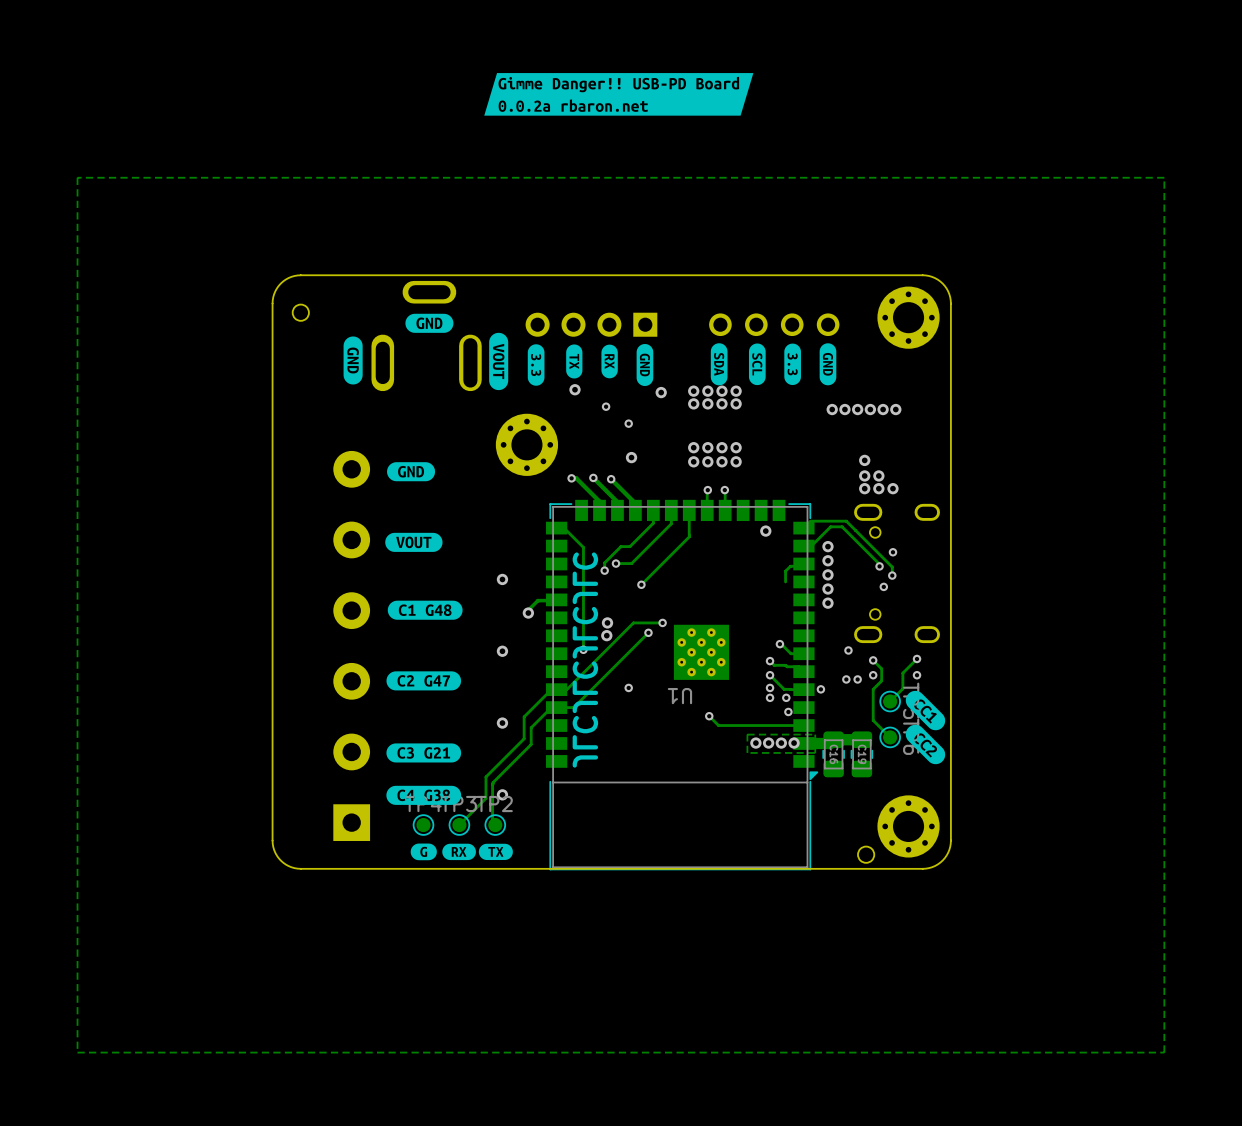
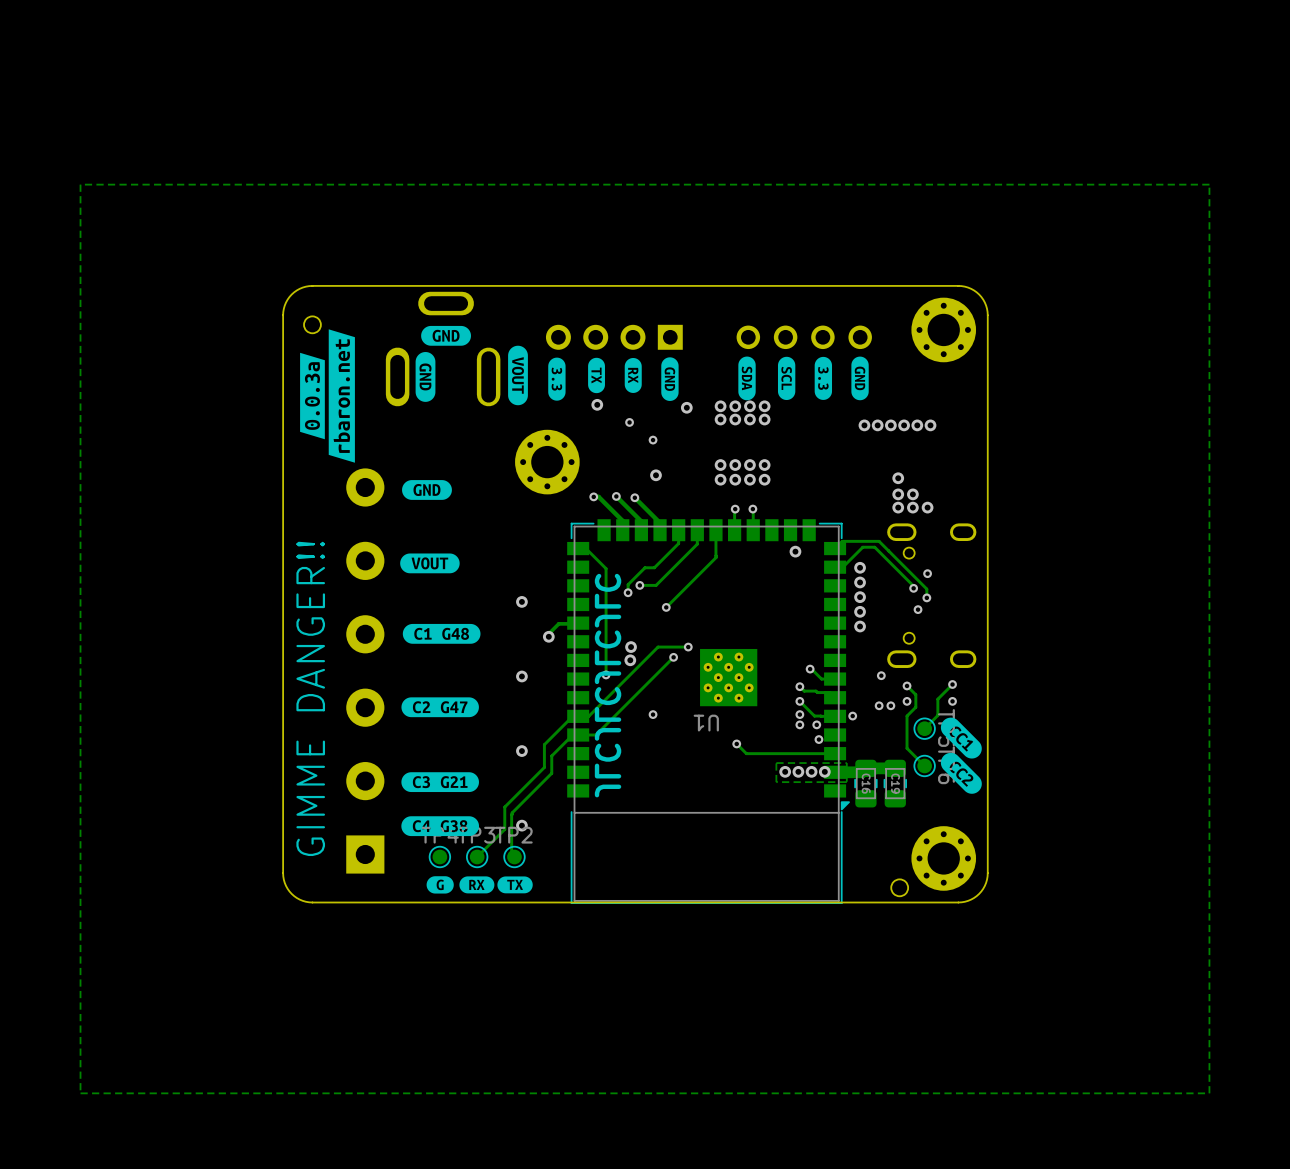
drawing: [484, 73, 754, 116] -> none
drawing: none -> [300, 329, 355, 463]
drawing position: (353, 360) -> (425, 376)
track: (803, 566) (790, 566) (785, 571) (785, 581) -> none
text: none -> GIMME DANGER!! (310, 698)

